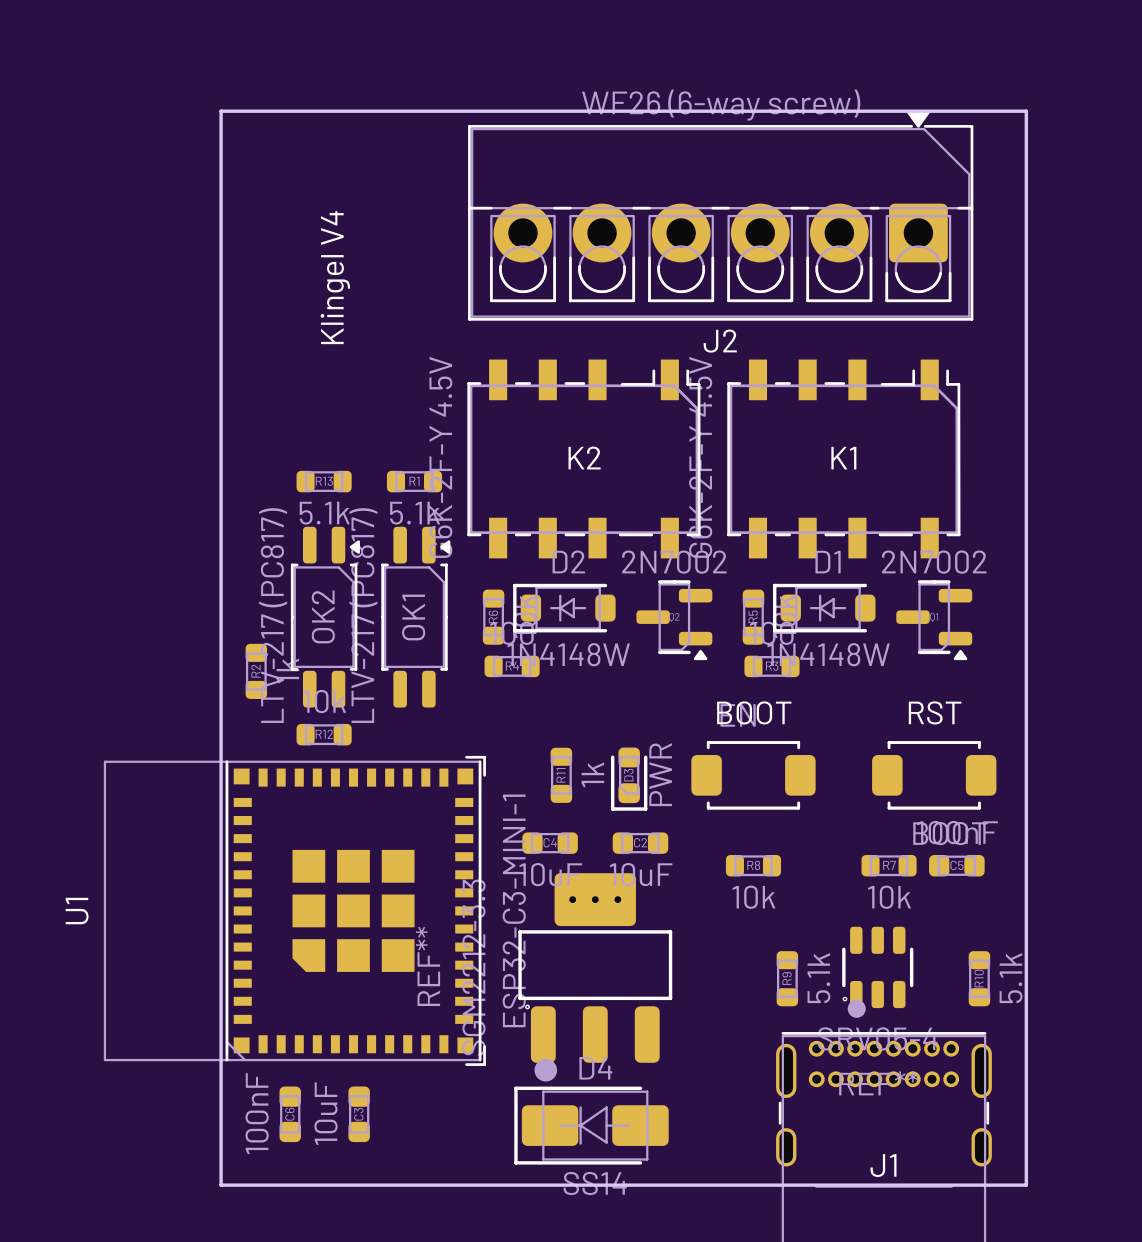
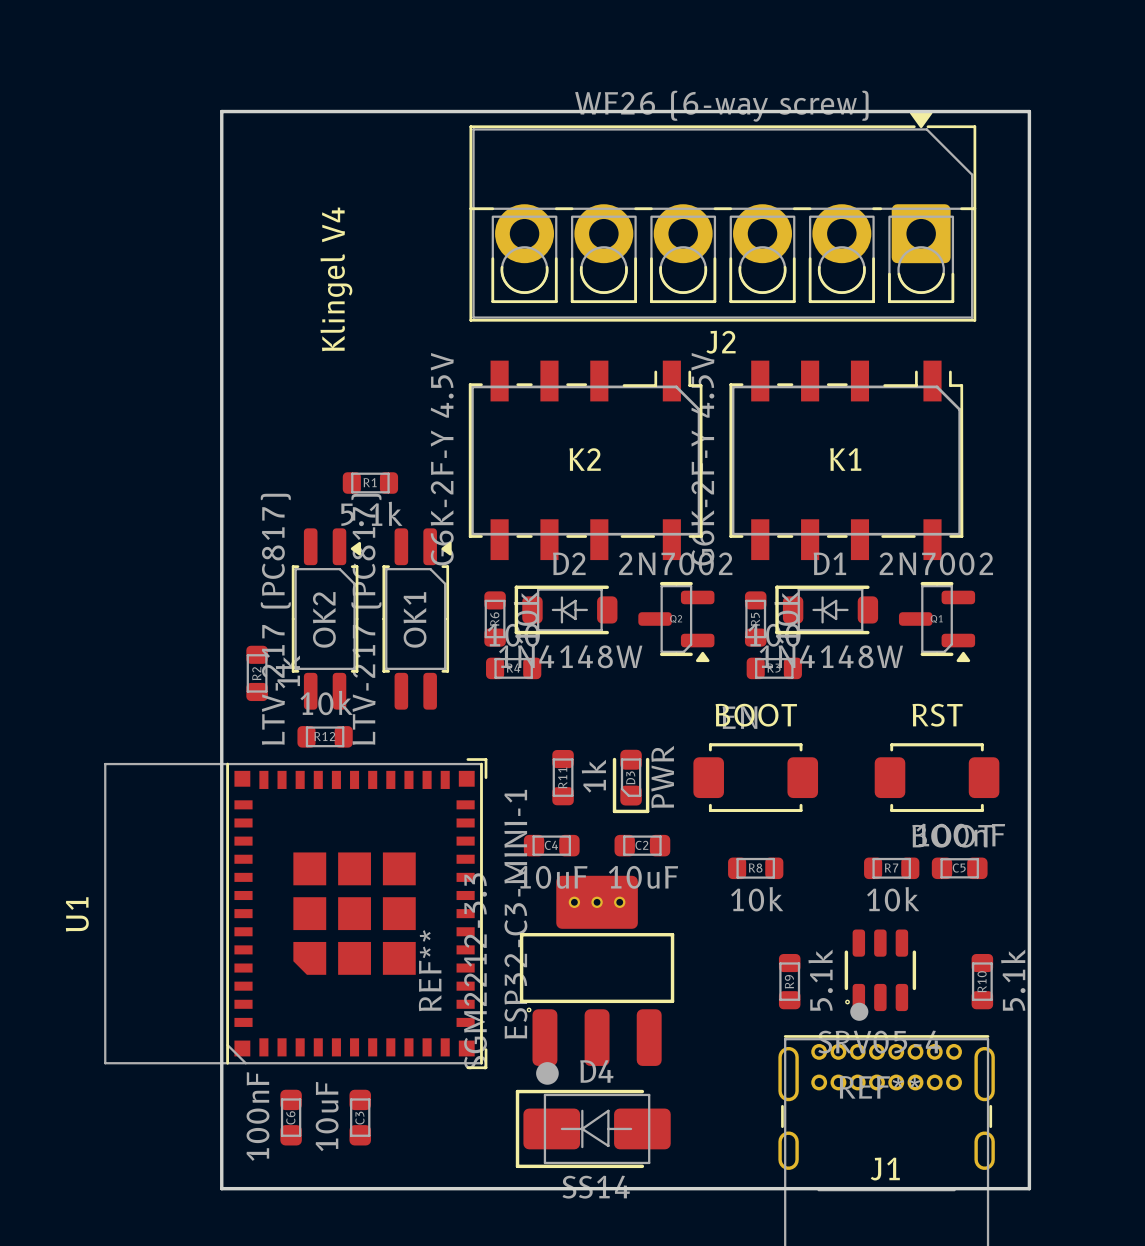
R13: 5.1k (324, 481) -> none
R1 position: (414, 481) -> (370, 483)

